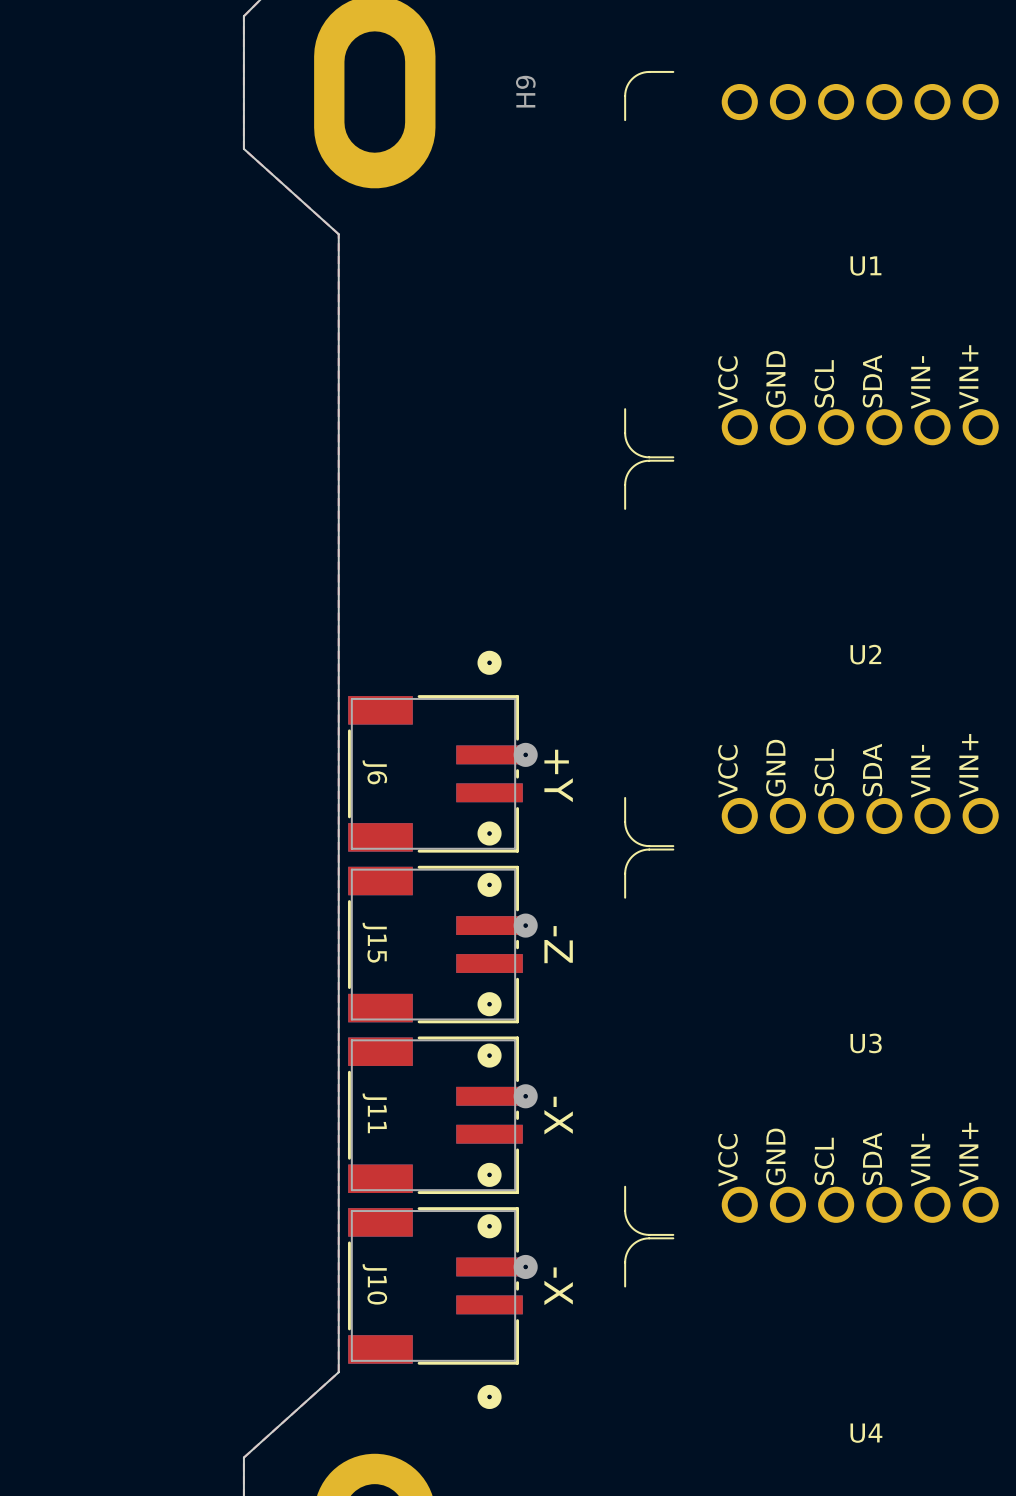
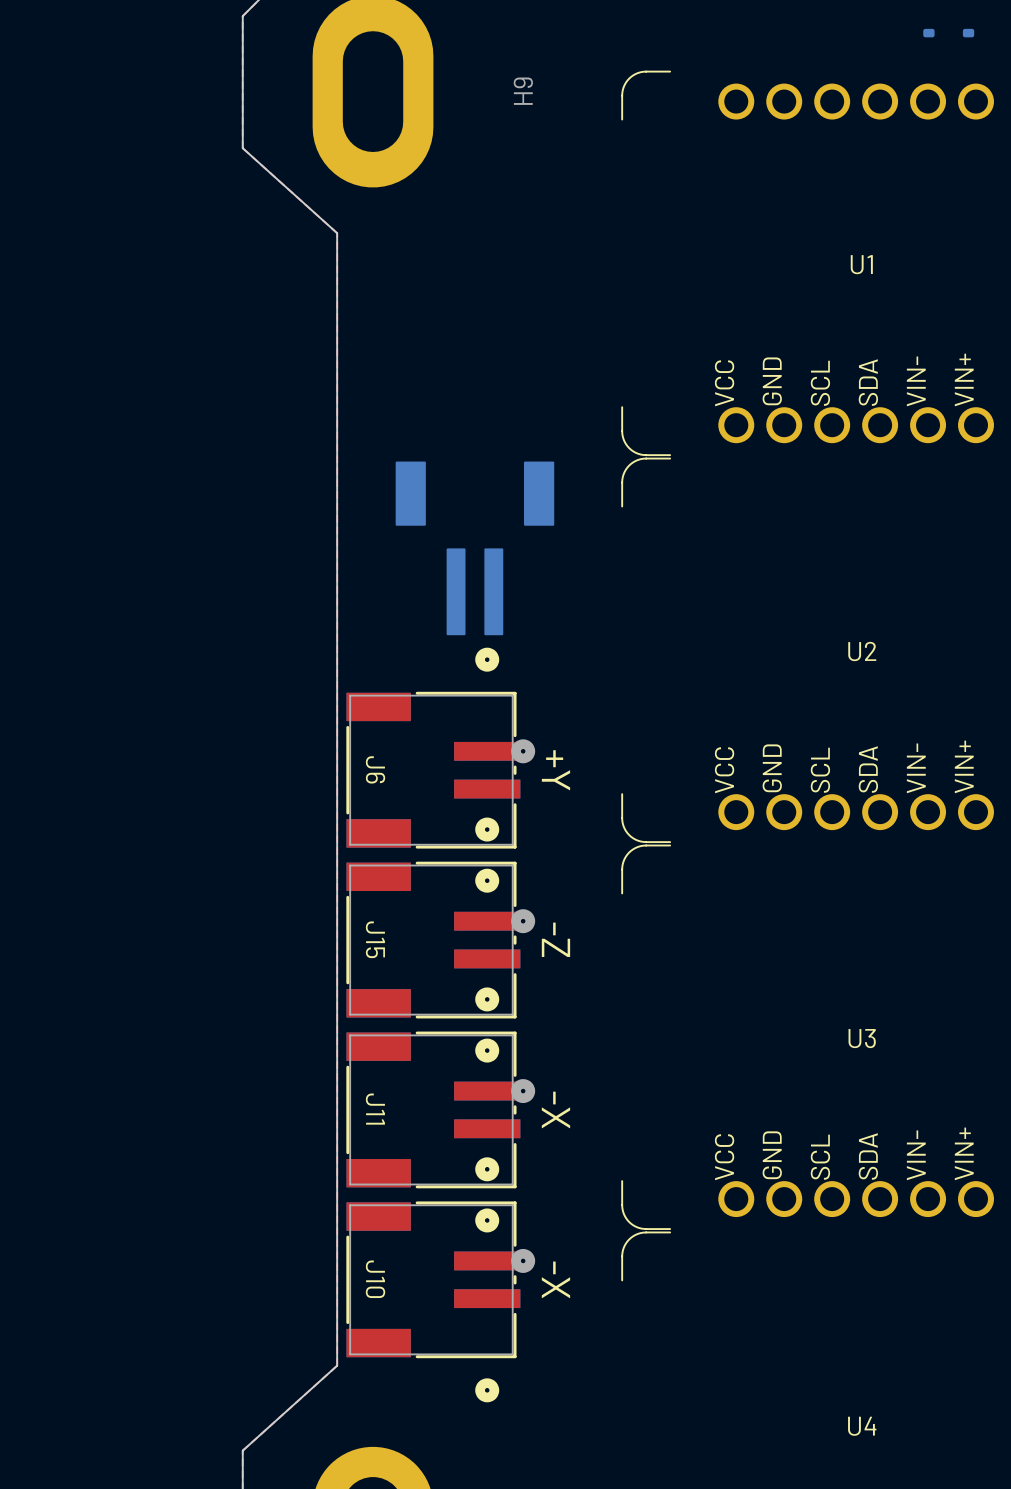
part: none -> (948, 33)
part: none -> (474, 548)

